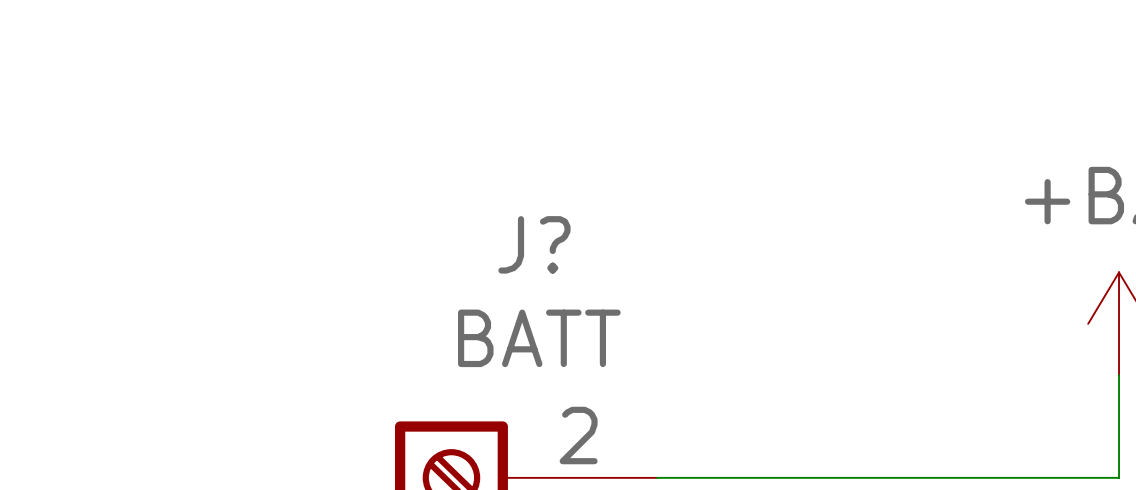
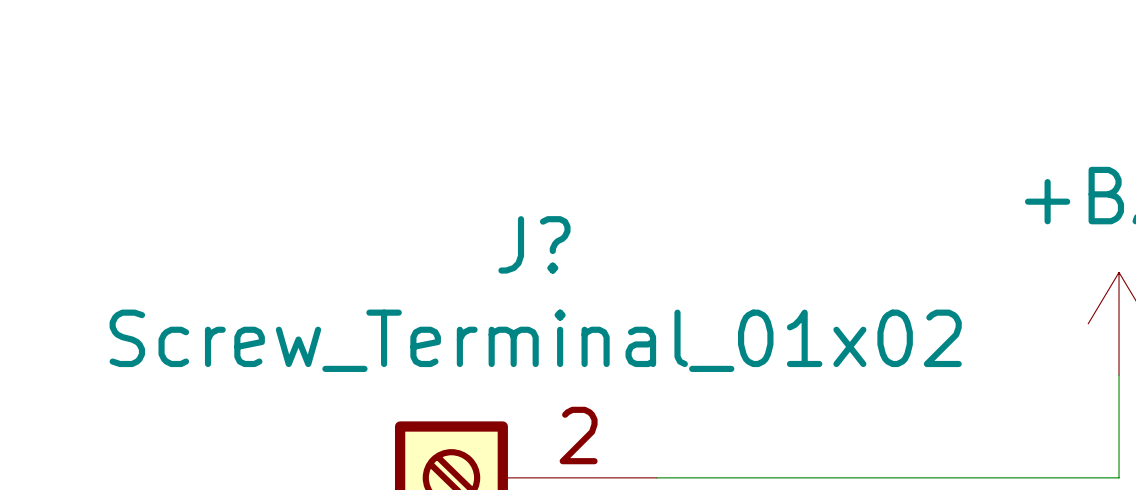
J? value: BATT (539, 338) -> Screw_Terminal_01x02 (535, 340)

